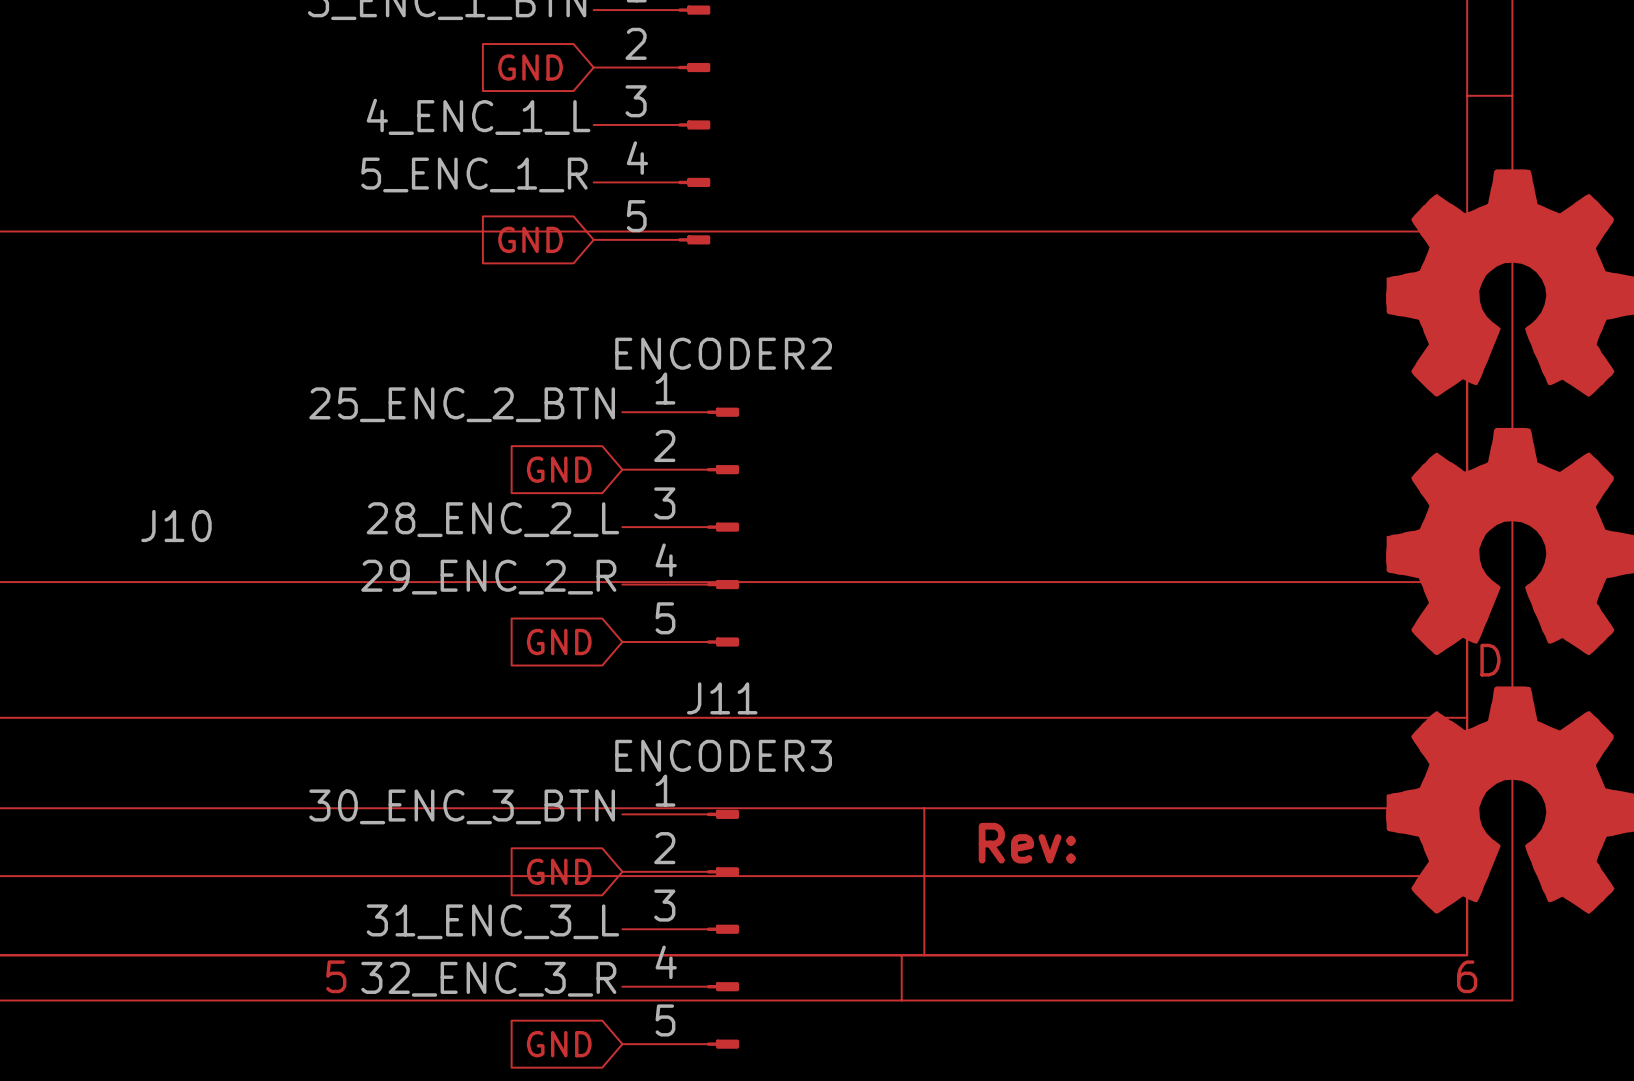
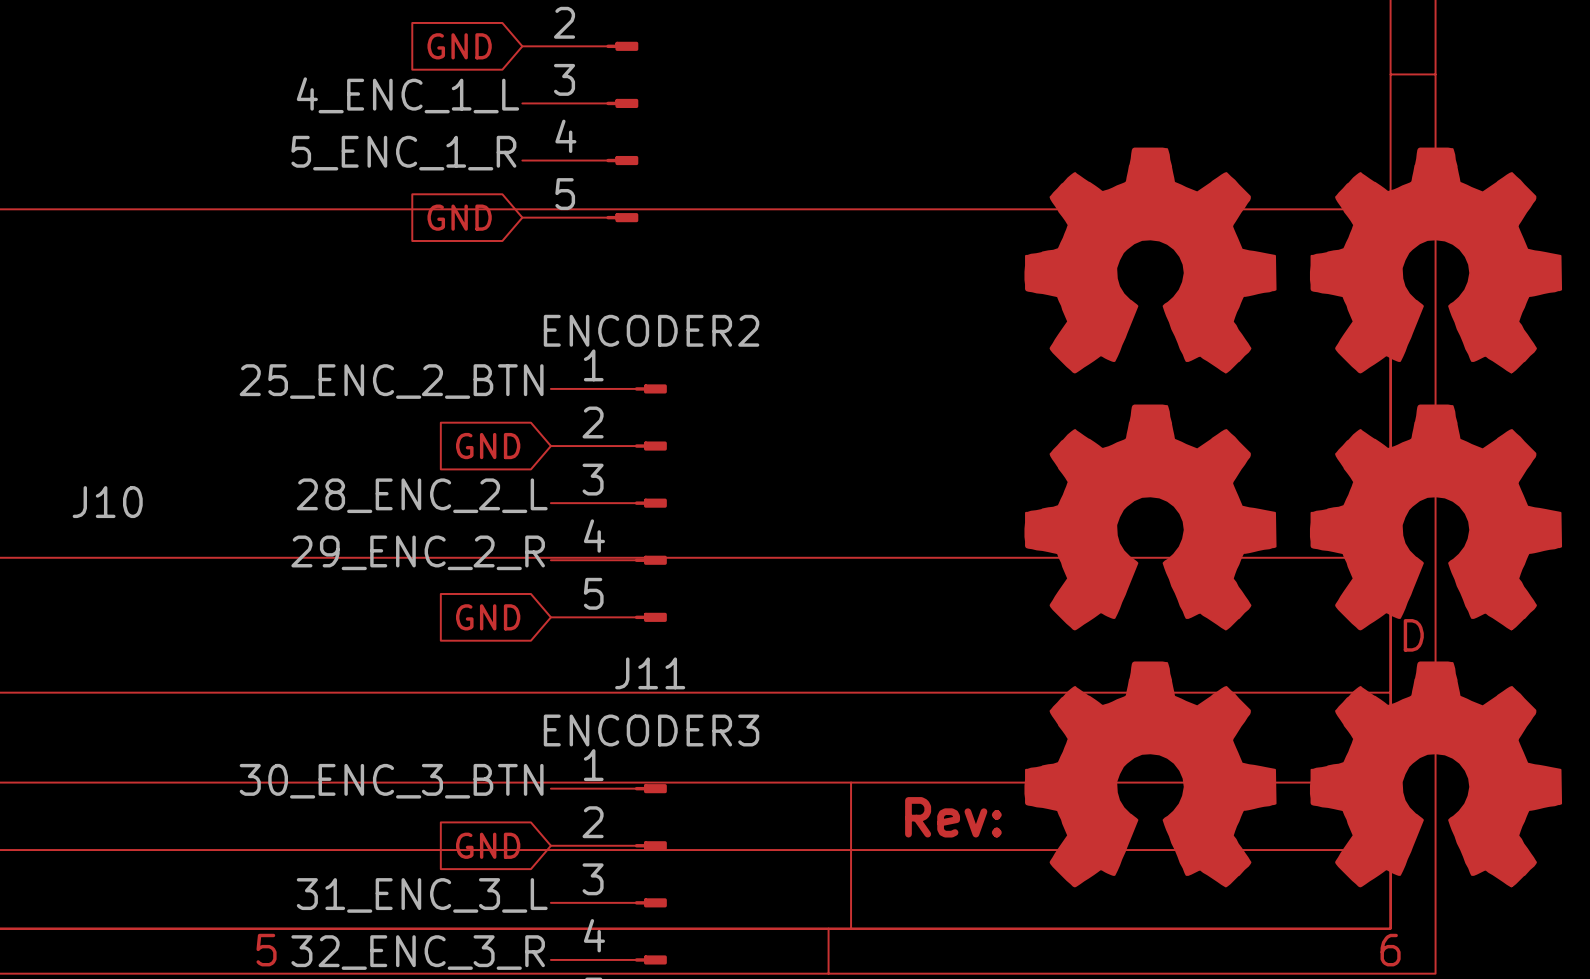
part: none -> (1150, 260)
part: none -> (1150, 517)
part: none -> (1150, 774)

